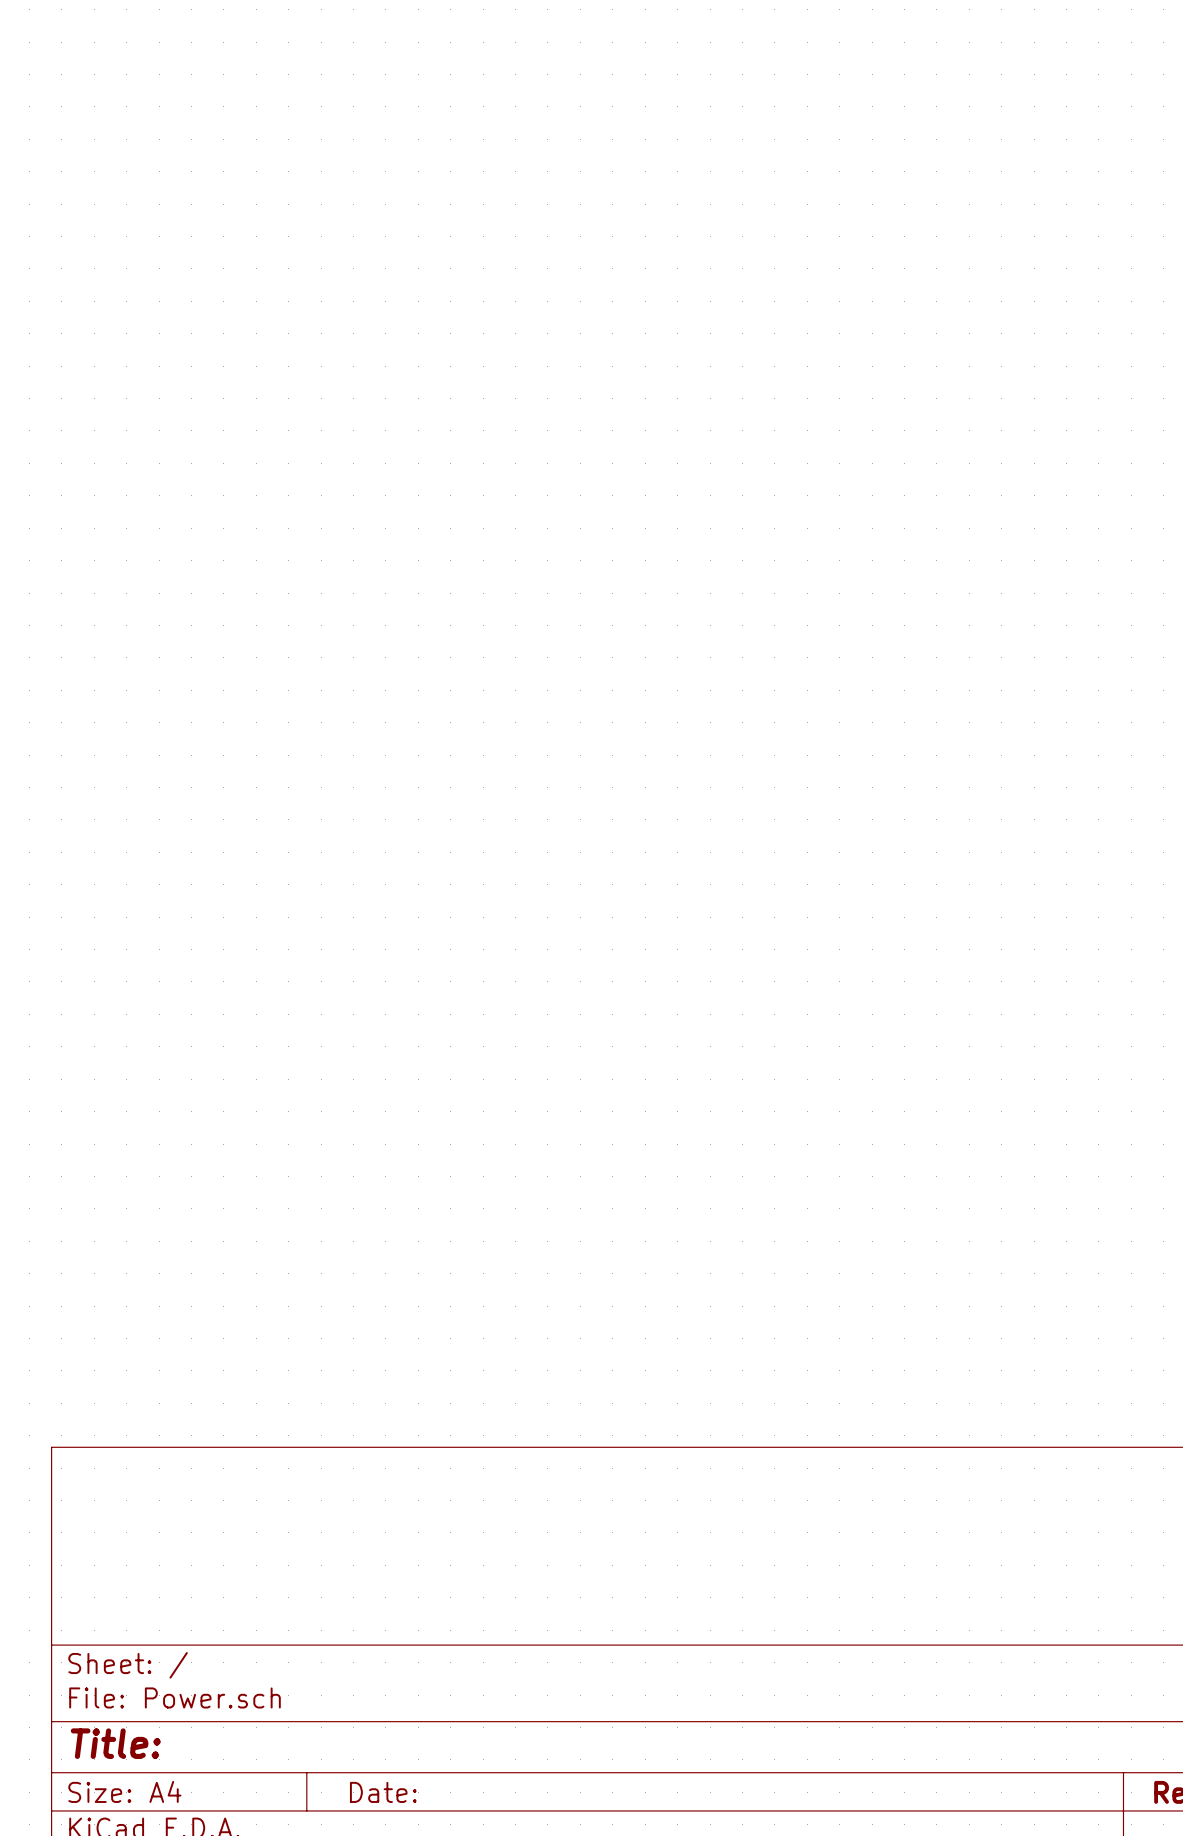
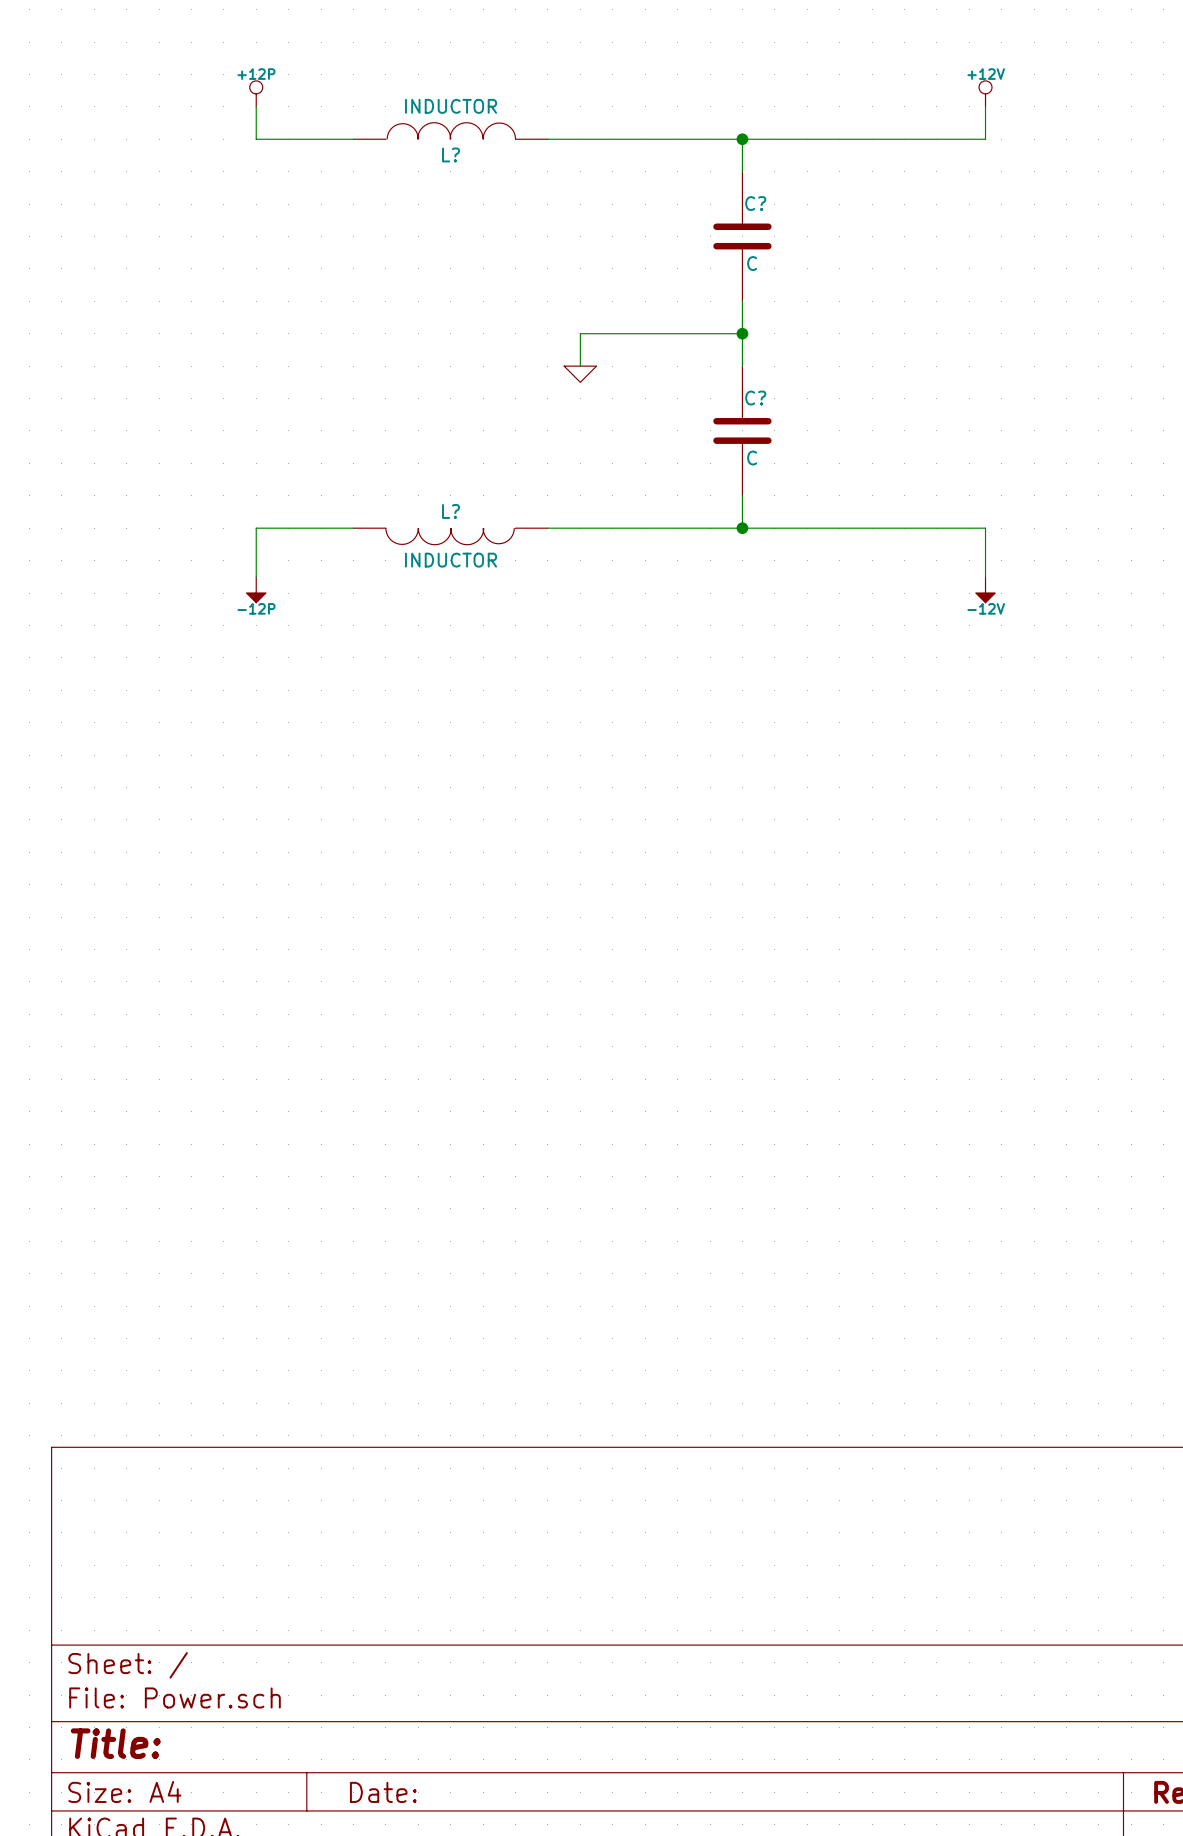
power symbol: none -> +12P (256, 93)
power symbol: none -> +12V (985, 93)
wire: none -> (256, 106) (256, 139) (353, 139)
wire: none -> (985, 106) (985, 139) (547, 139)
L?: none -> INDUCTOR (450, 130)
wire: none -> (742, 139) (742, 171)
junction: none -> (742, 139)
C?: none -> C (742, 236)
wire: none -> (742, 301) (742, 366)
wire: none -> (742, 333) (580, 333) (580, 366)
junction: none -> (742, 333)
power symbol: none -> (580, 374)
C?: none -> C (742, 430)
wire: none -> (742, 495) (742, 528)
wire: none -> (353, 528) (256, 528) (256, 576)
wire: none -> (547, 528) (985, 528) (985, 576)
junction: none -> (742, 528)
L?: none -> INDUCTOR (450, 536)
power symbol: none -> -12P (256, 589)
power symbol: none -> -12V (985, 589)

